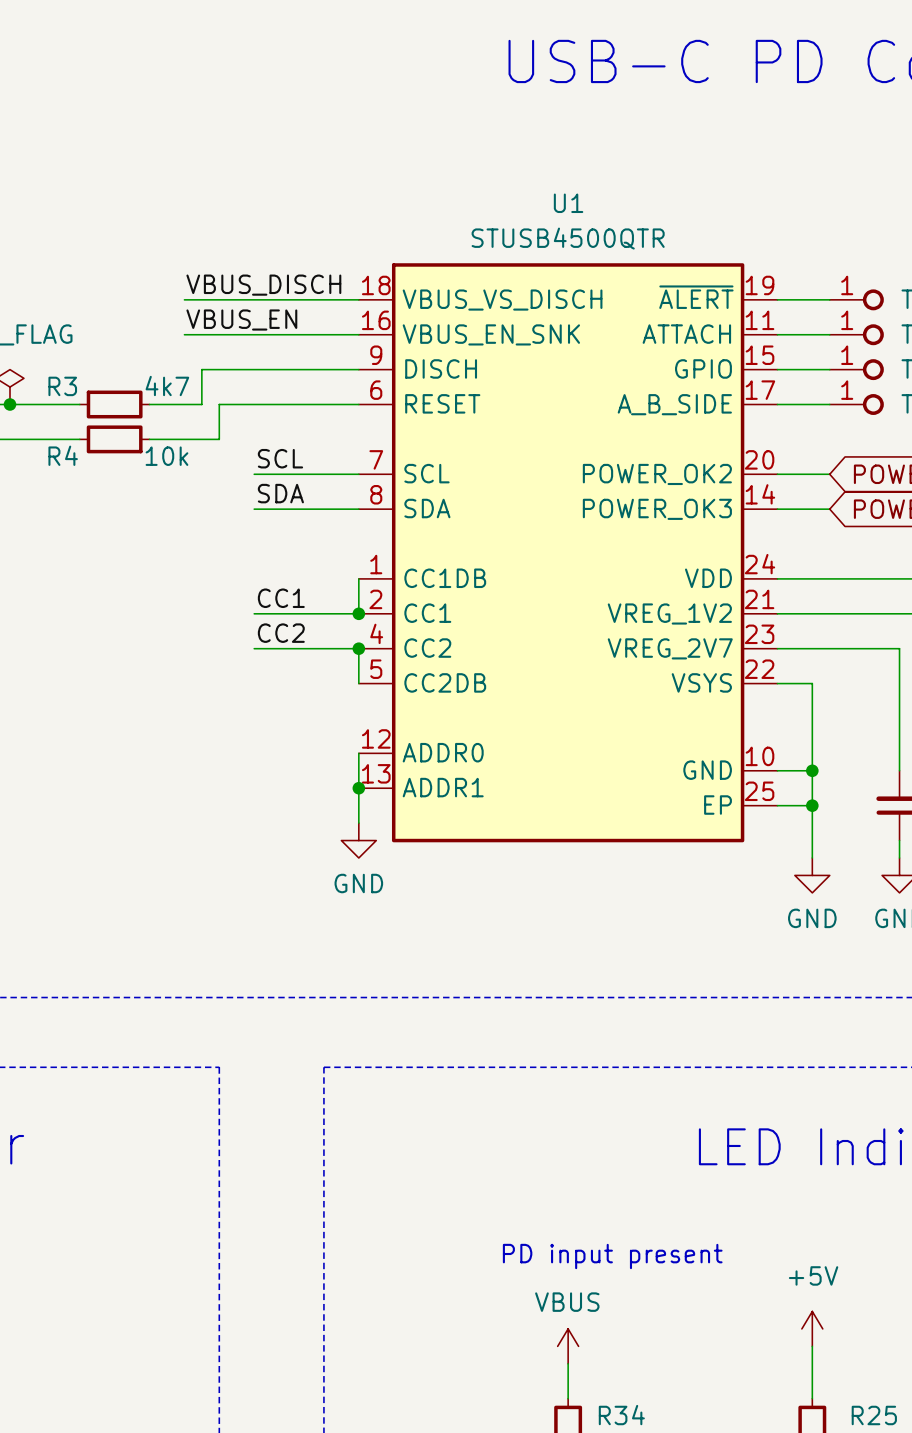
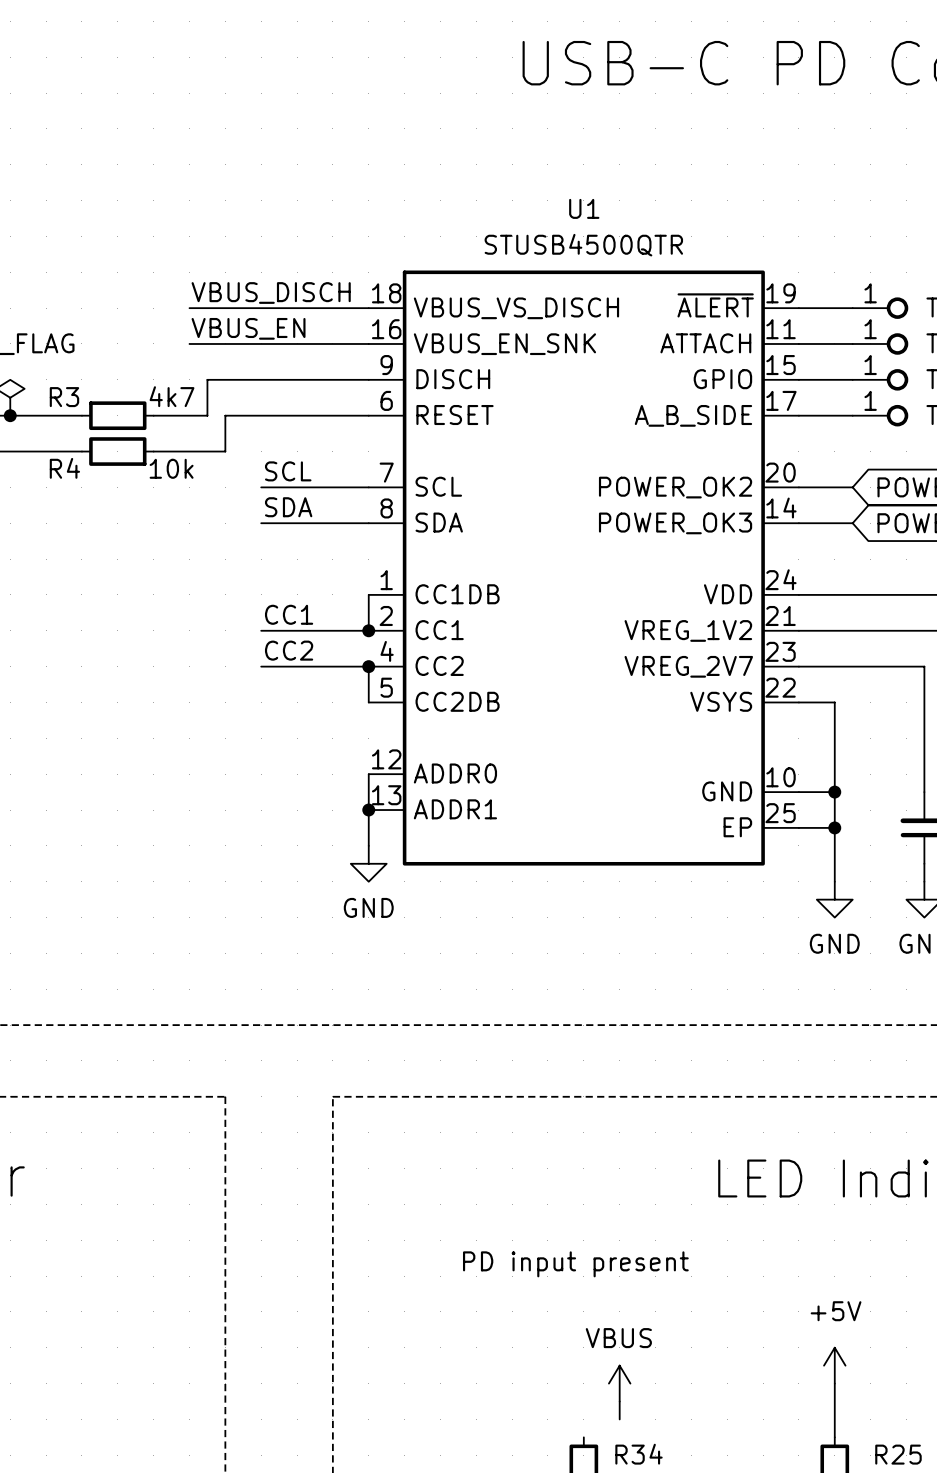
text position: PD input present (612, 1256) -> PD input present (575, 1264)
power symbol position: VBUS (568, 1346) -> VBUS (619, 1383)
wire: (568, 1363) (568, 1398) -> none
wire: none -> (619, 1401) (619, 1419)

